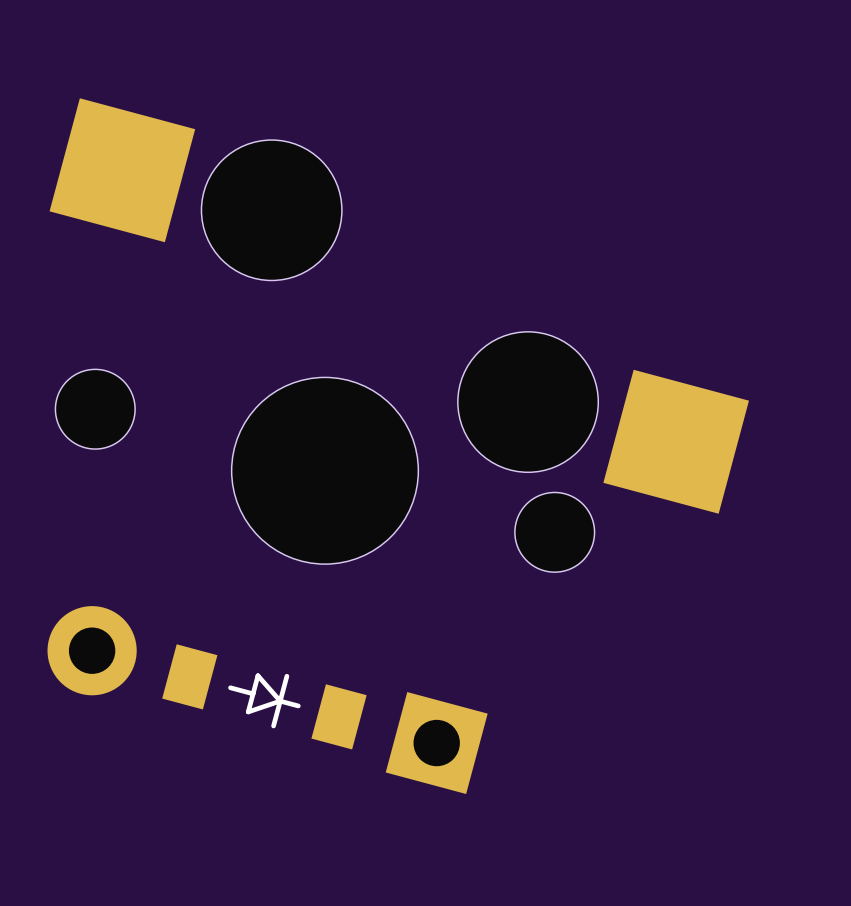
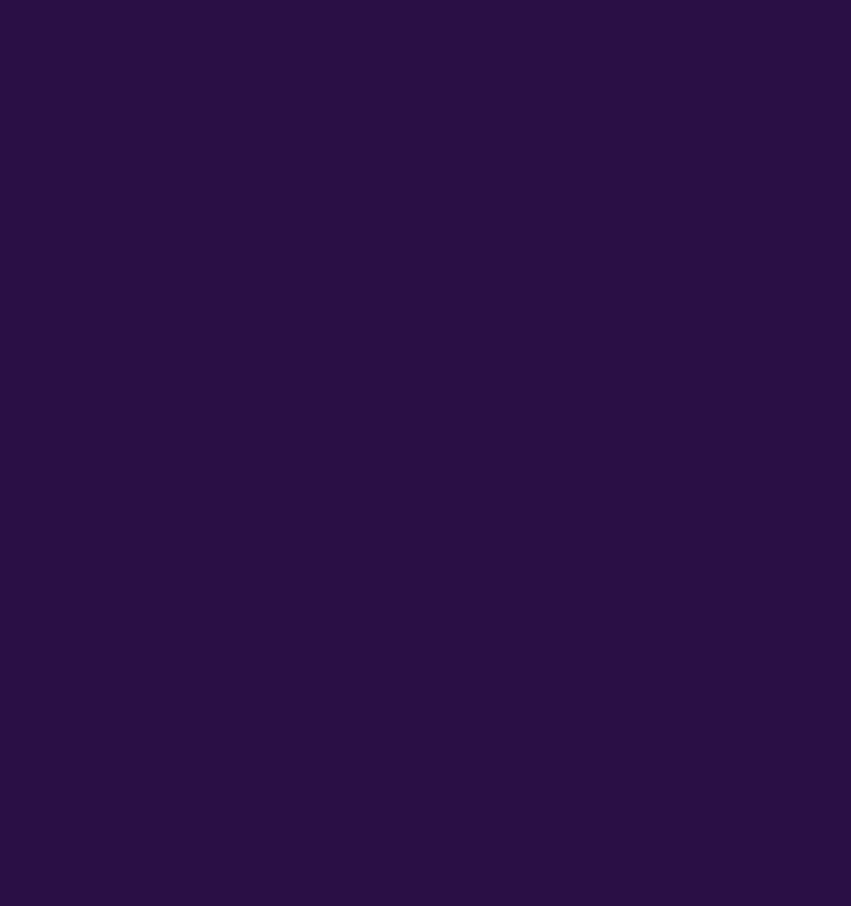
part: (399, 335) -> none
part: (267, 700) -> none

